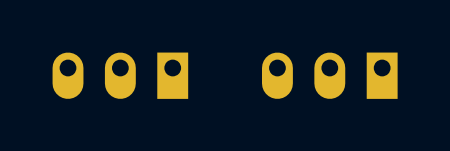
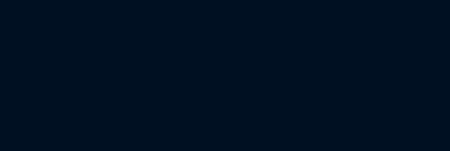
part: (120, 75) -> none
part: (329, 75) -> none

